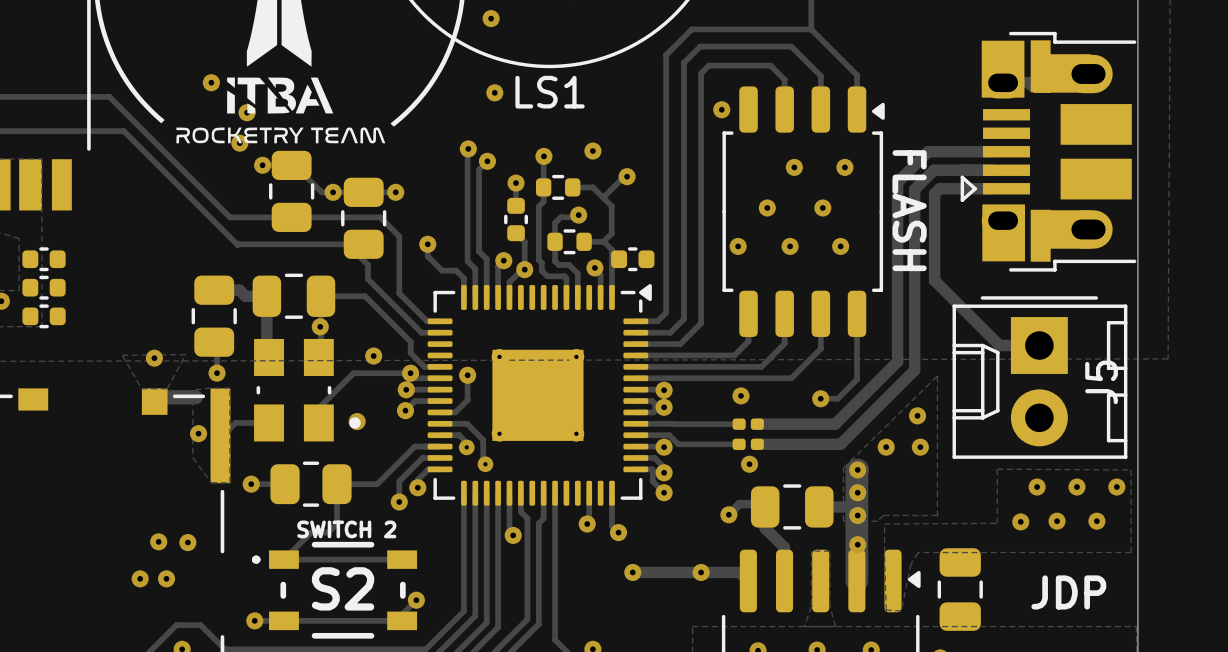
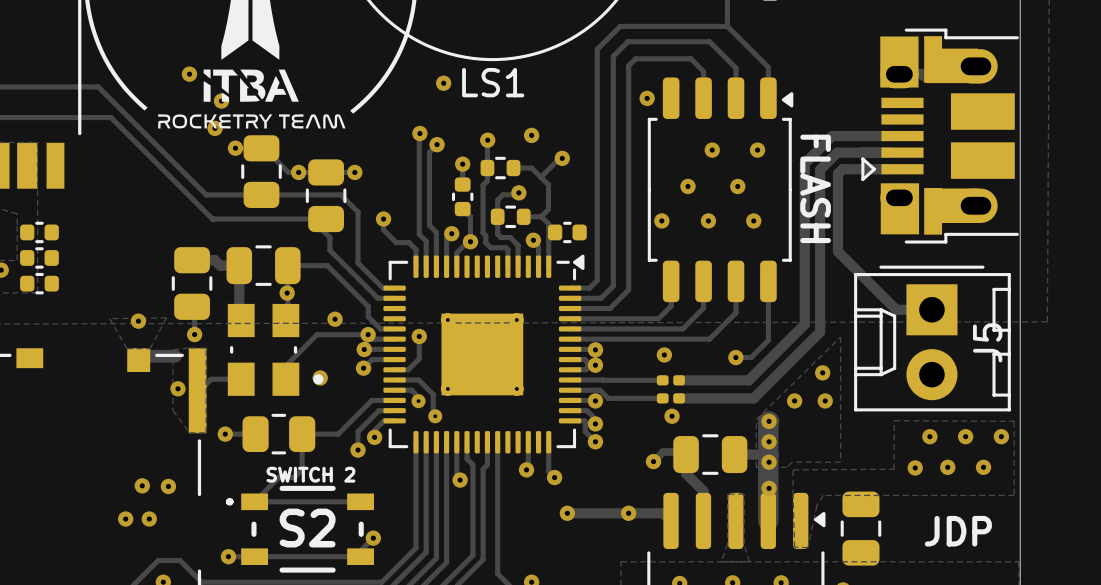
via: (491, 18) -> none

